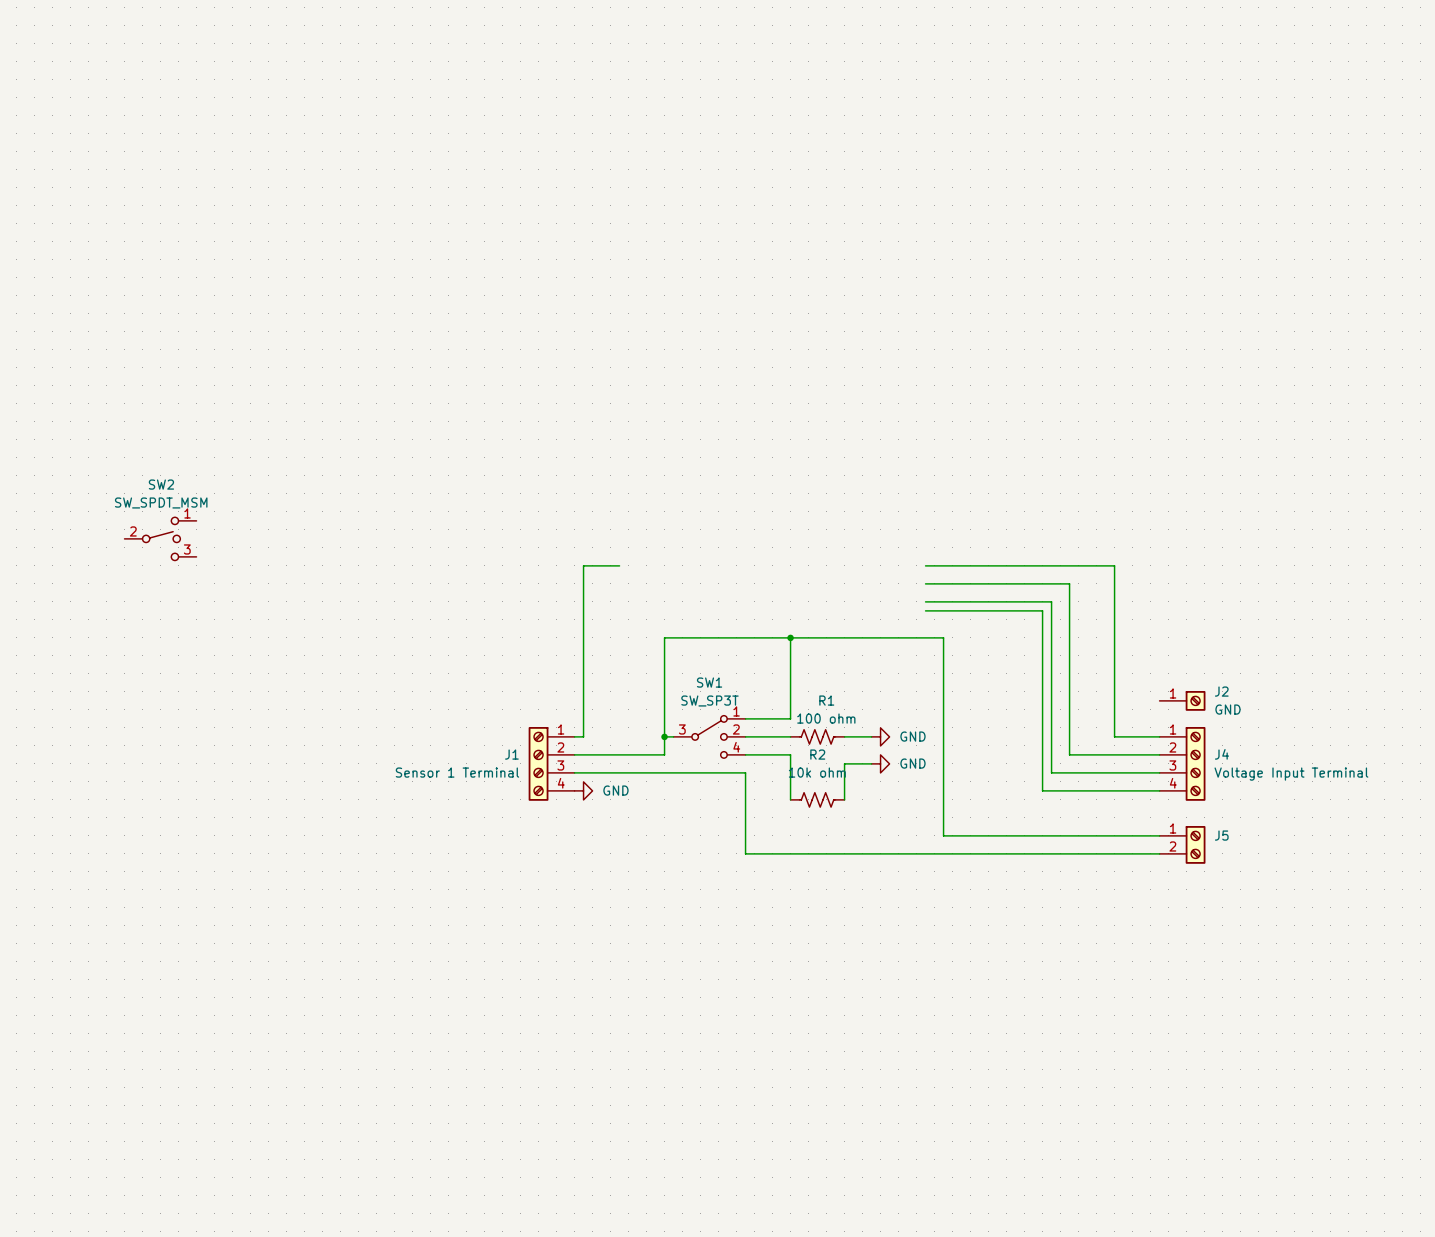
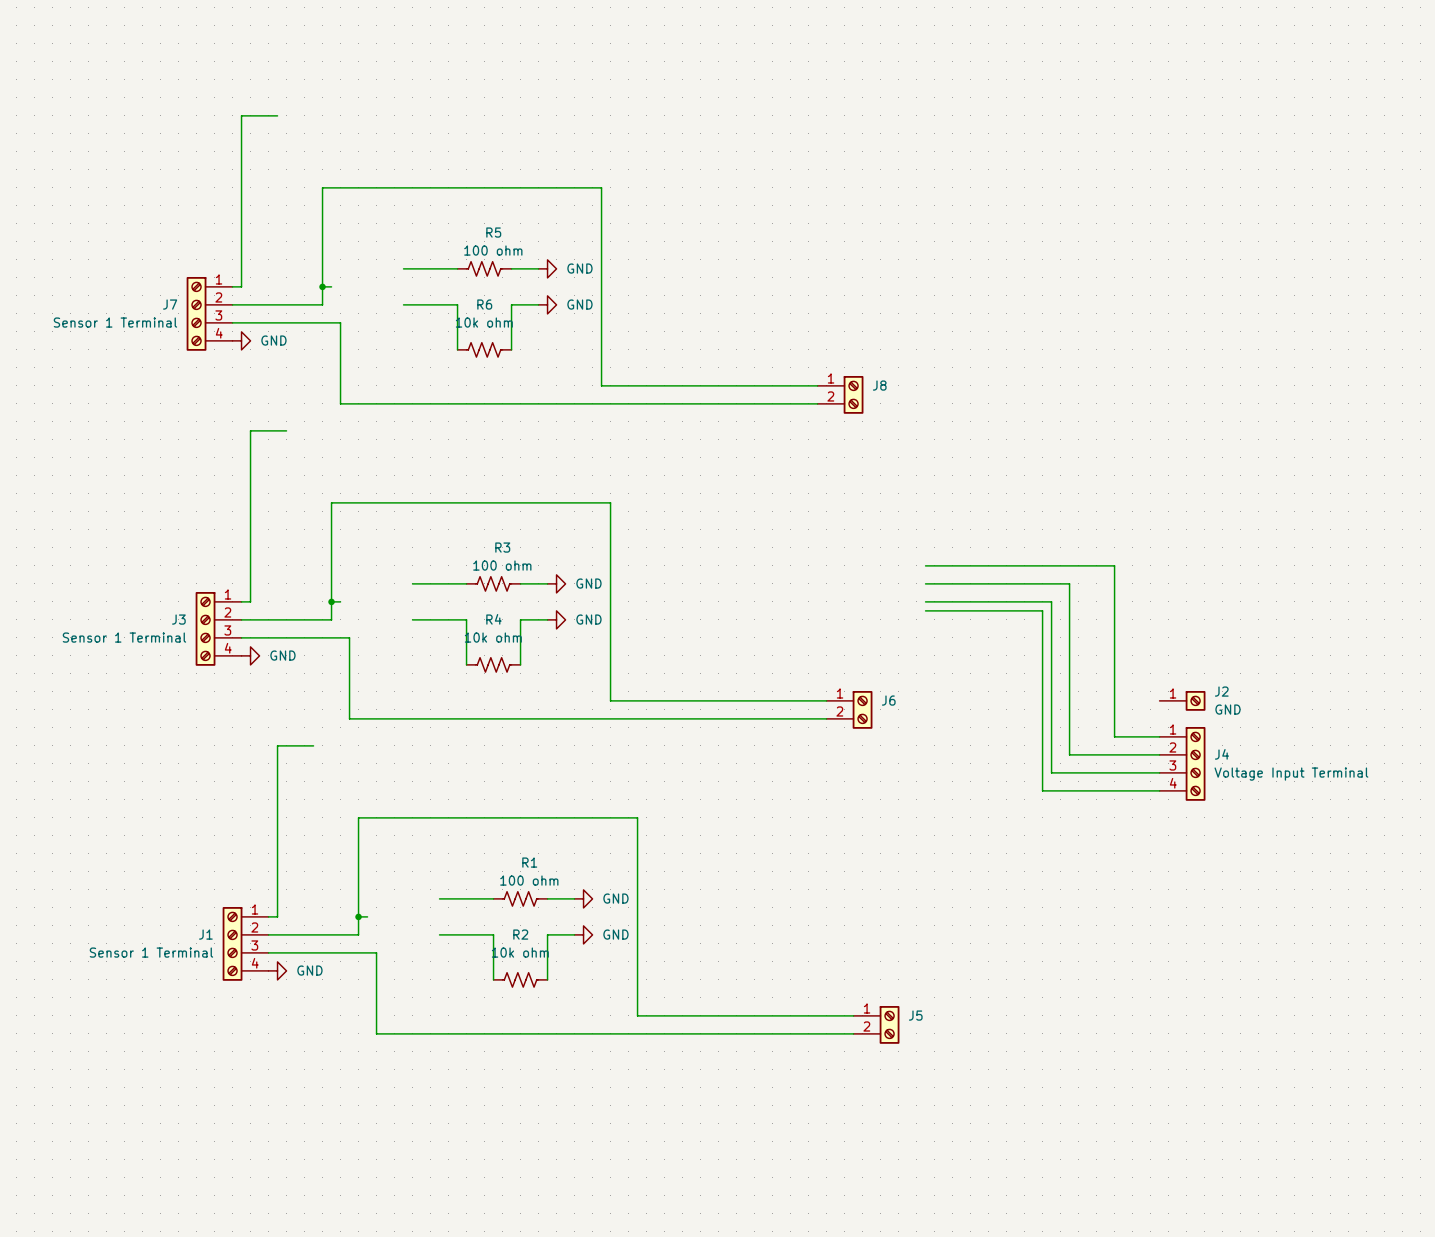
wire: none -> (277, 115) (241, 115) (241, 286) (232, 286)
wire: none -> (403, 268) (457, 268)
R5: none -> 100 ohm (484, 268)
wire: none -> (511, 268) (538, 268)
power symbol: none -> GND (547, 268)
wire: none -> (322, 286) (331, 286)
junction: none -> (322, 286)
wire: none -> (232, 304) (322, 304) (322, 187) (601, 187) (601, 385) (817, 385)
wire: none -> (403, 304) (457, 304) (457, 349)
wire: none -> (538, 304) (511, 304) (511, 349)
power symbol: none -> GND (547, 304)
J7: none -> Sensor 1 Terminal (209, 313)
wire: none -> (232, 322) (340, 322) (340, 403) (817, 403)
power symbol: none -> GND (241, 340)
R6: none -> 10k ohm (484, 349)
J8: none -> (840, 394)
wire: none -> (286, 430) (250, 430) (250, 601) (241, 601)
SW2: SW_SPDT_MSM (160, 538) -> none
wire: (619, 565) (583, 565) (583, 736) (574, 736) -> none
wire: none -> (412, 583) (466, 583)
R3: none -> 100 ohm (493, 583)
wire: none -> (520, 583) (547, 583)
power symbol: none -> GND (556, 583)
wire: none -> (331, 601) (340, 601)
junction: none -> (331, 601)
wire: none -> (241, 619) (331, 619) (331, 502) (610, 502) (610, 700) (826, 700)
wire: none -> (412, 619) (466, 619) (466, 664)
wire: none -> (547, 619) (520, 619) (520, 664)
power symbol: none -> GND (556, 619)
J3: none -> Sensor 1 Terminal (218, 628)
wire: none -> (241, 637) (349, 637) (349, 718) (745, 718)
wire: (790, 637) (790, 718) -> (826, 718) (790, 718)
junction: (790, 637) -> none
power symbol: none -> GND (250, 655)
R4: none -> 10k ohm (493, 664)
J6: none -> (849, 709)
wire: (664, 736) (673, 736) -> none
junction: (664, 736) -> none
SW1: SW_SP3T (709, 736) -> none
wire: (745, 736) (790, 736) -> none
R1 position: (817, 736) -> (520, 898)
wire: (844, 736) (871, 736) -> none
power symbol: GND (880, 736) -> none
wire: none -> (313, 745) (277, 745) (277, 916) (268, 916)
wire: (574, 754) (664, 754) (664, 637) (943, 637) (943, 835) (1159, 835) -> none
wire: (745, 754) (790, 754) (790, 799) -> none
J1 position: (551, 763) -> (245, 943)
wire: (871, 763) (844, 763) (844, 799) -> none
power symbol: GND (880, 763) -> none
wire: (574, 772) (745, 772) (745, 853) (1159, 853) -> none
power symbol: GND (583, 790) -> none
R2 position: (817, 799) -> (520, 979)
J5 position: (1182, 844) -> (876, 1024)
wire: none -> (439, 898) (493, 898)
wire: none -> (547, 898) (574, 898)
power symbol: none -> GND (583, 898)
wire: none -> (358, 916) (367, 916)
junction: none -> (358, 916)
wire: none -> (268, 934) (358, 934) (358, 817) (637, 817) (637, 1015) (853, 1015)
wire: none -> (439, 934) (493, 934) (493, 979)
wire: none -> (574, 934) (547, 934) (547, 979)
power symbol: none -> GND (583, 934)
wire: none -> (268, 952) (376, 952) (376, 1033) (853, 1033)
power symbol: none -> GND (277, 970)

